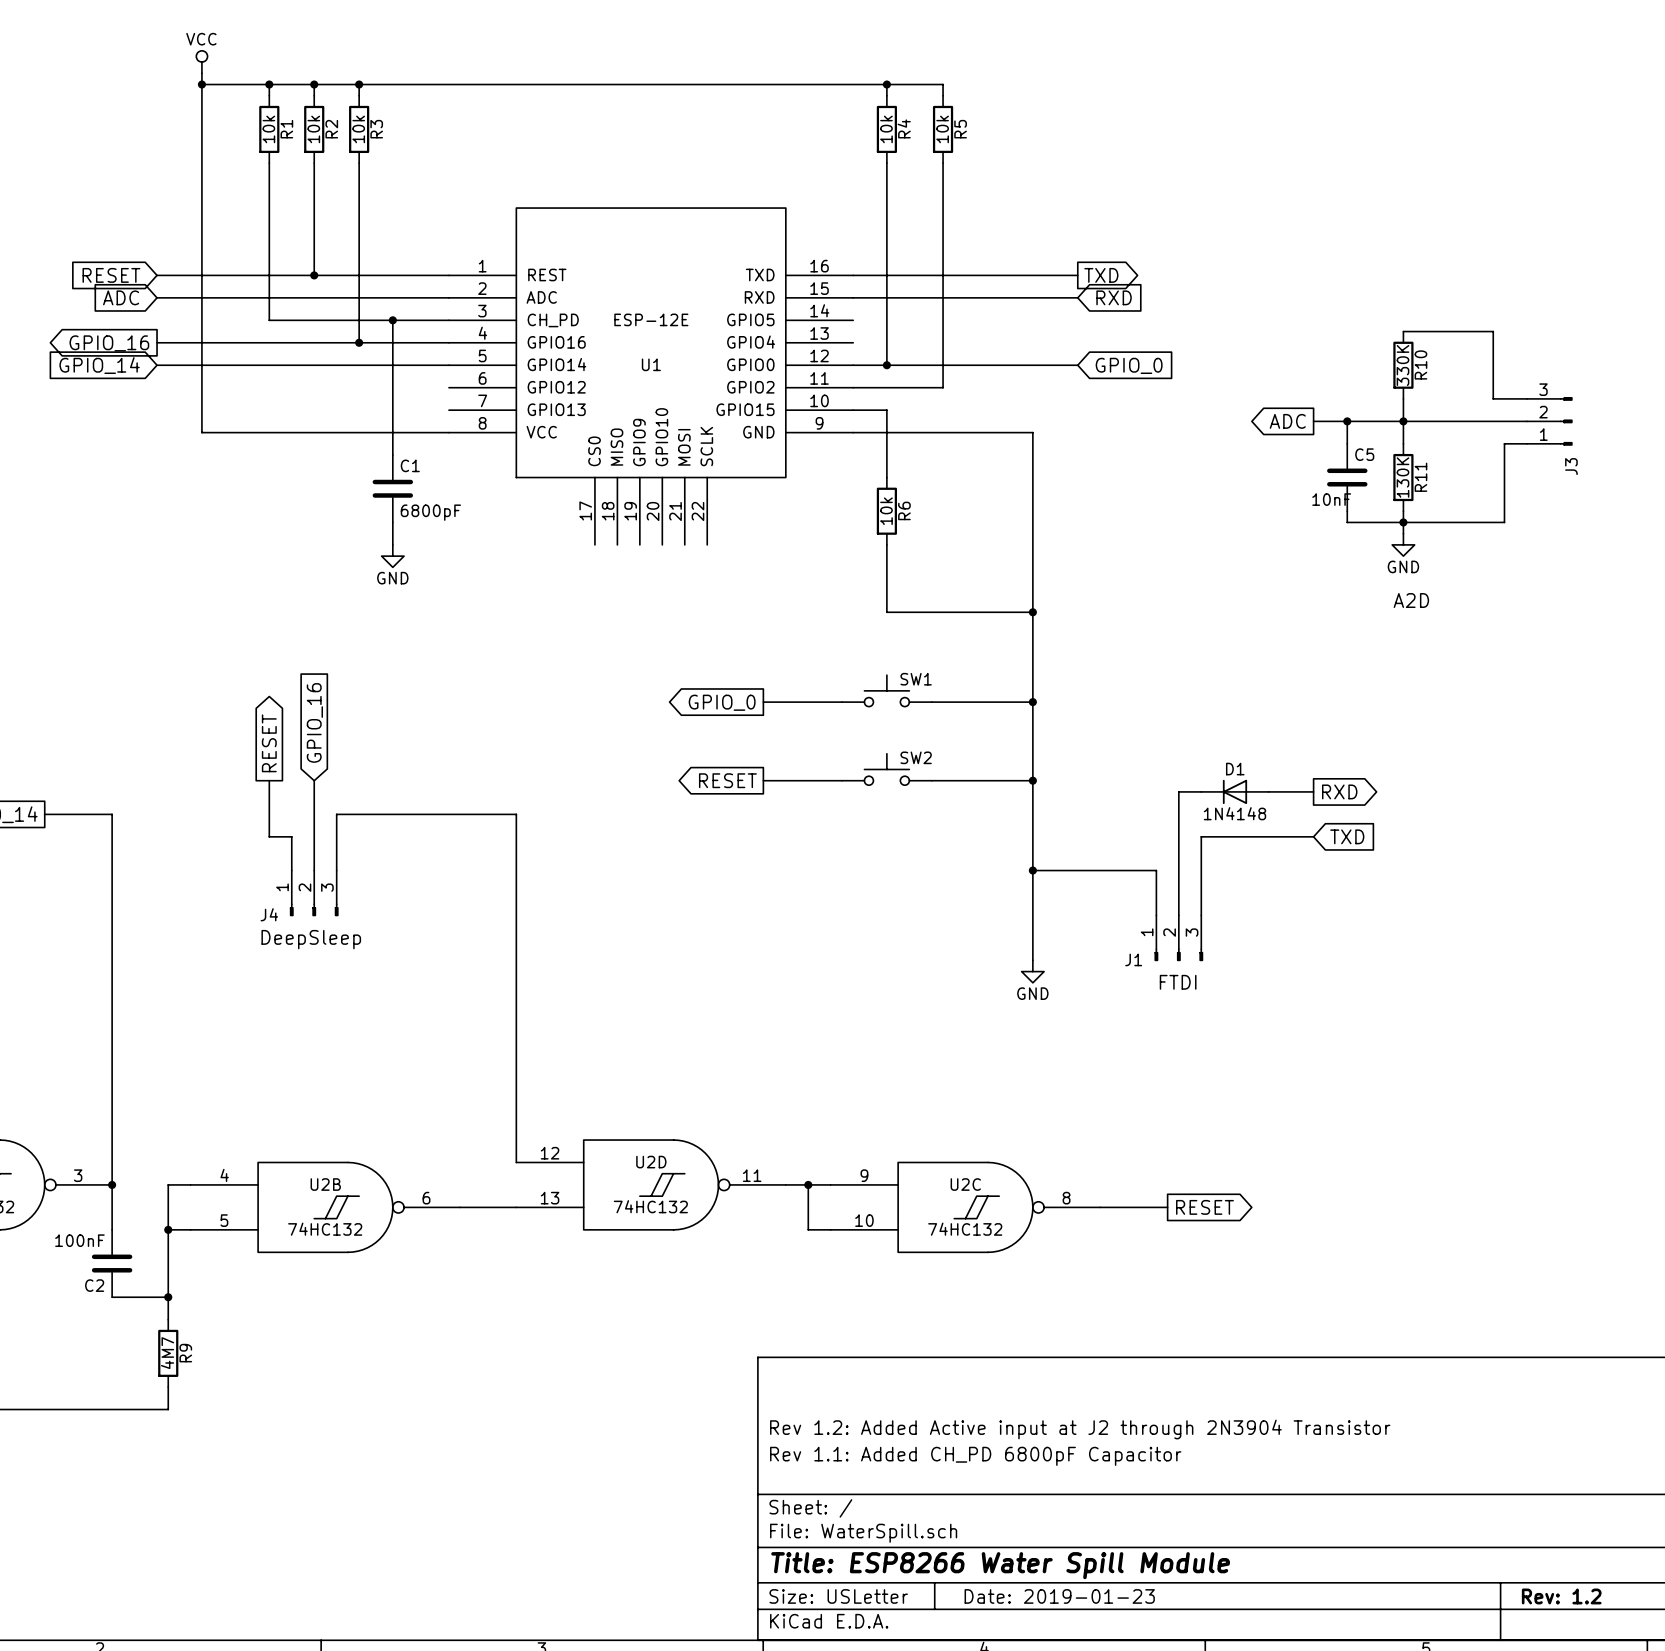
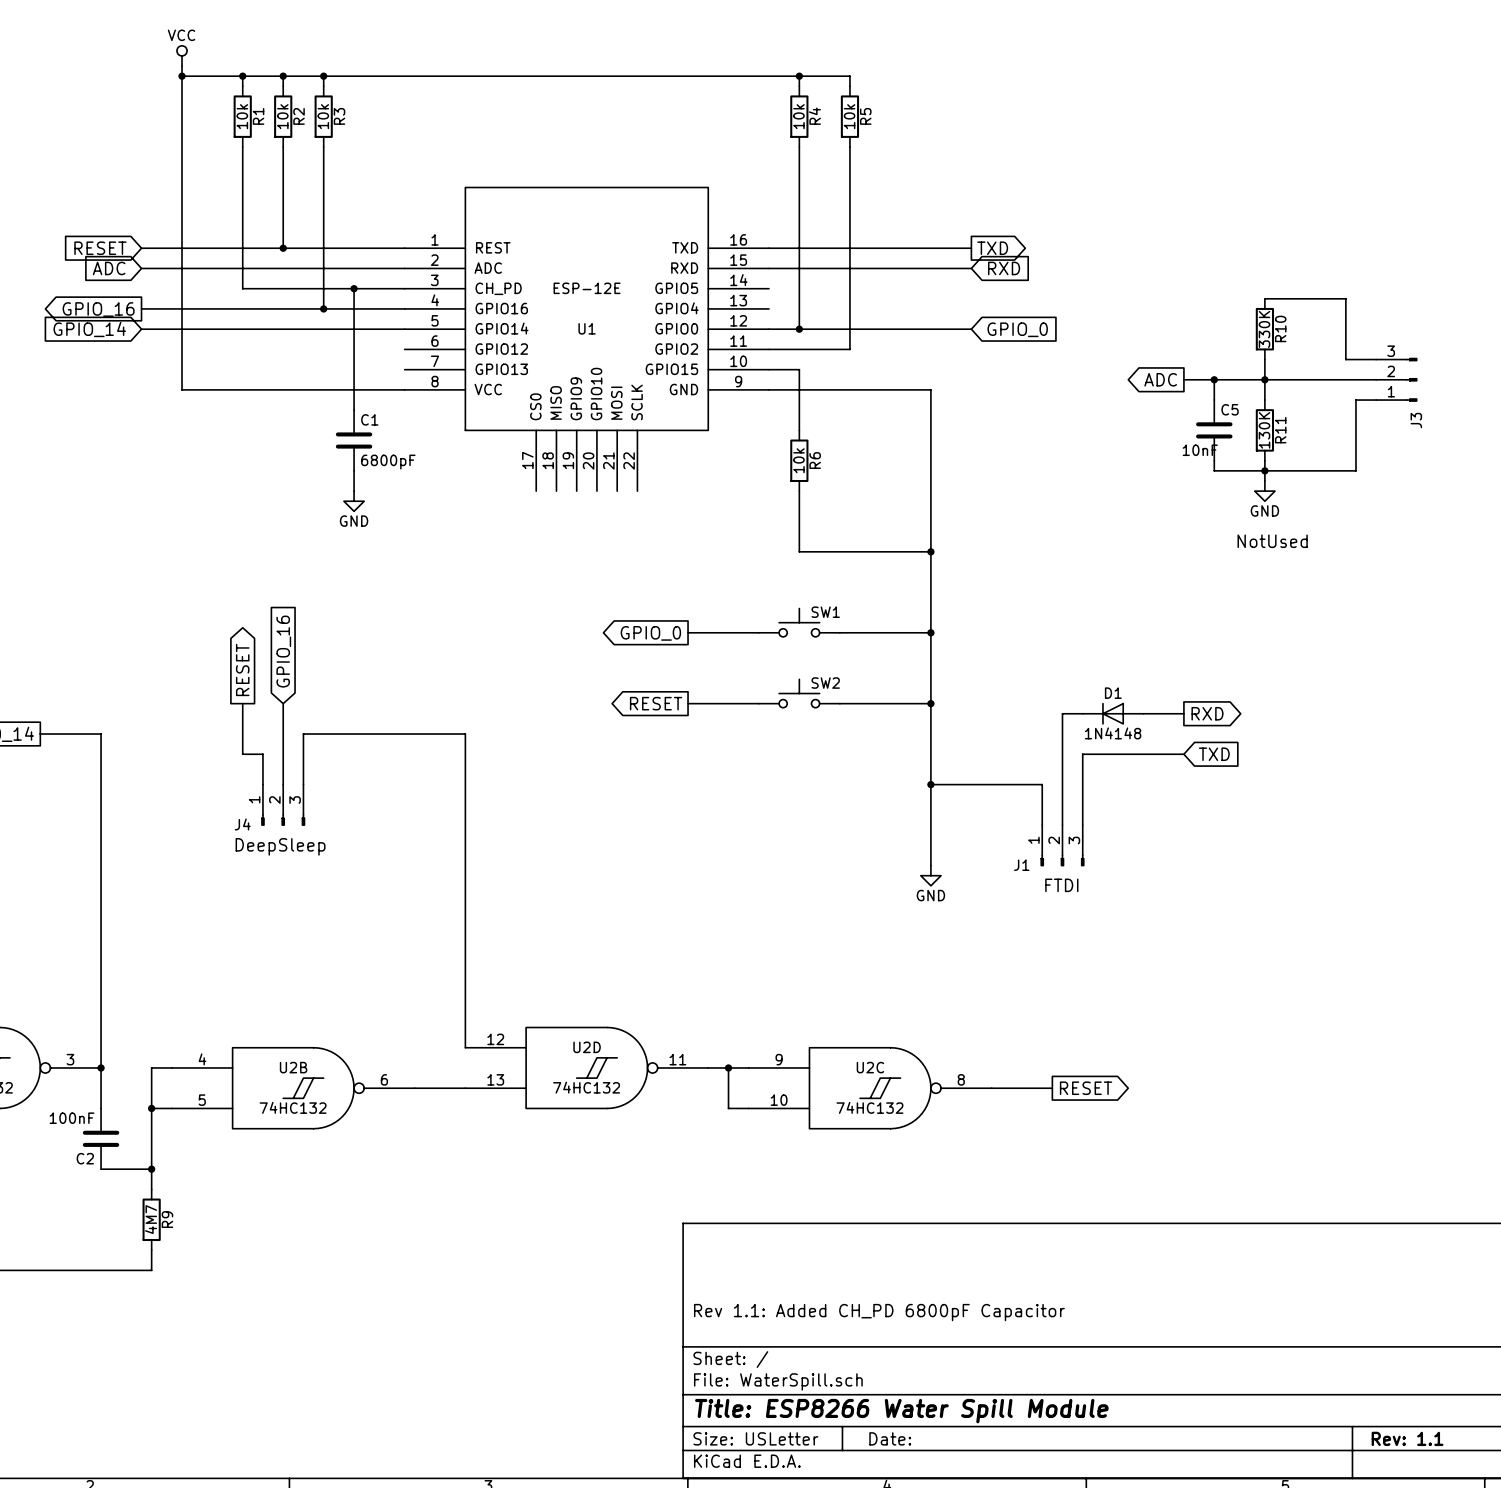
label: A2D (1411, 600) -> none
label: none -> NotUsed (1272, 541)
title block: Rev 1.2: Added Active input at J2 through 2N3904 Transistor (1080, 1429) -> none
title block: Date: 2019-01-23 (1059, 1596) -> Date: (890, 1438)
title block: Rev: 1.2 (1561, 1596) -> Rev: 1.1 (1407, 1438)

